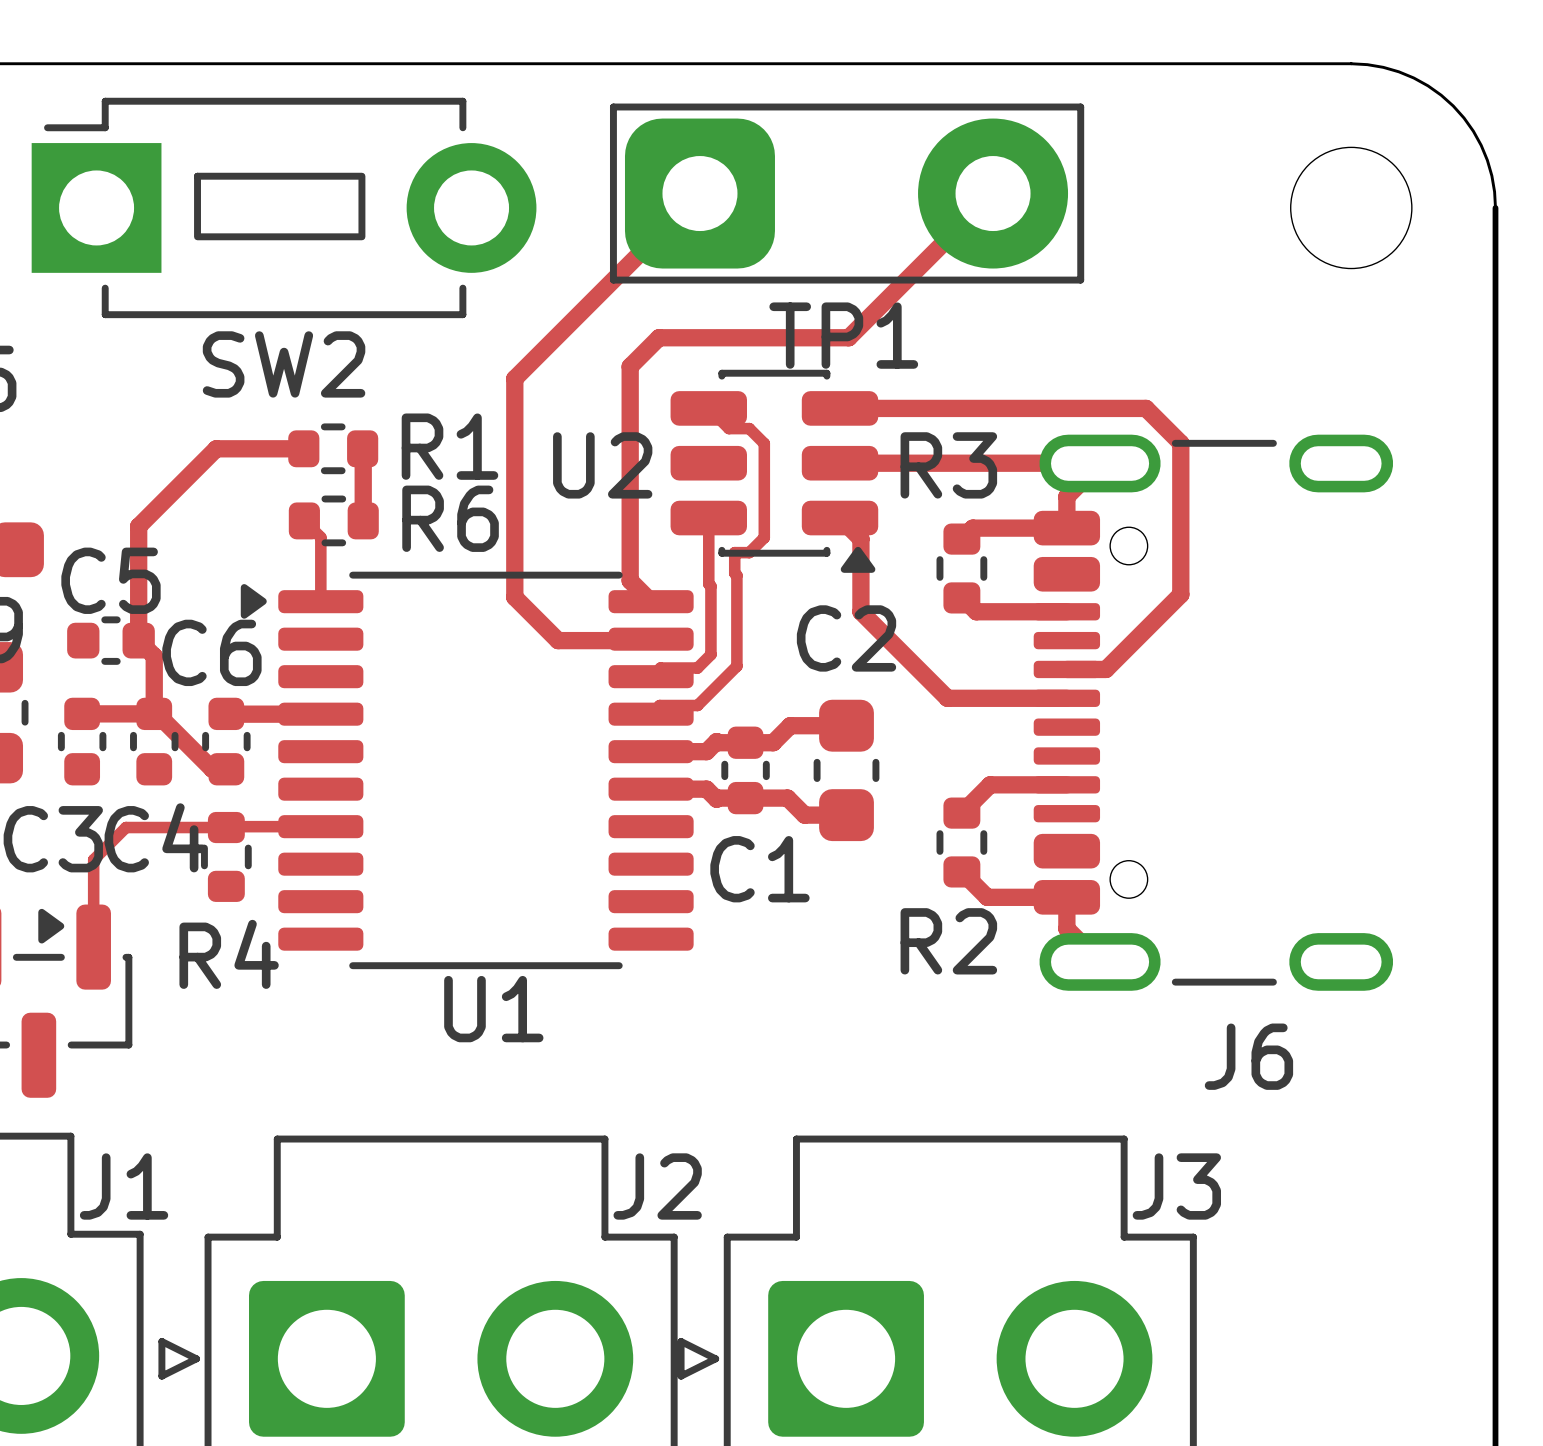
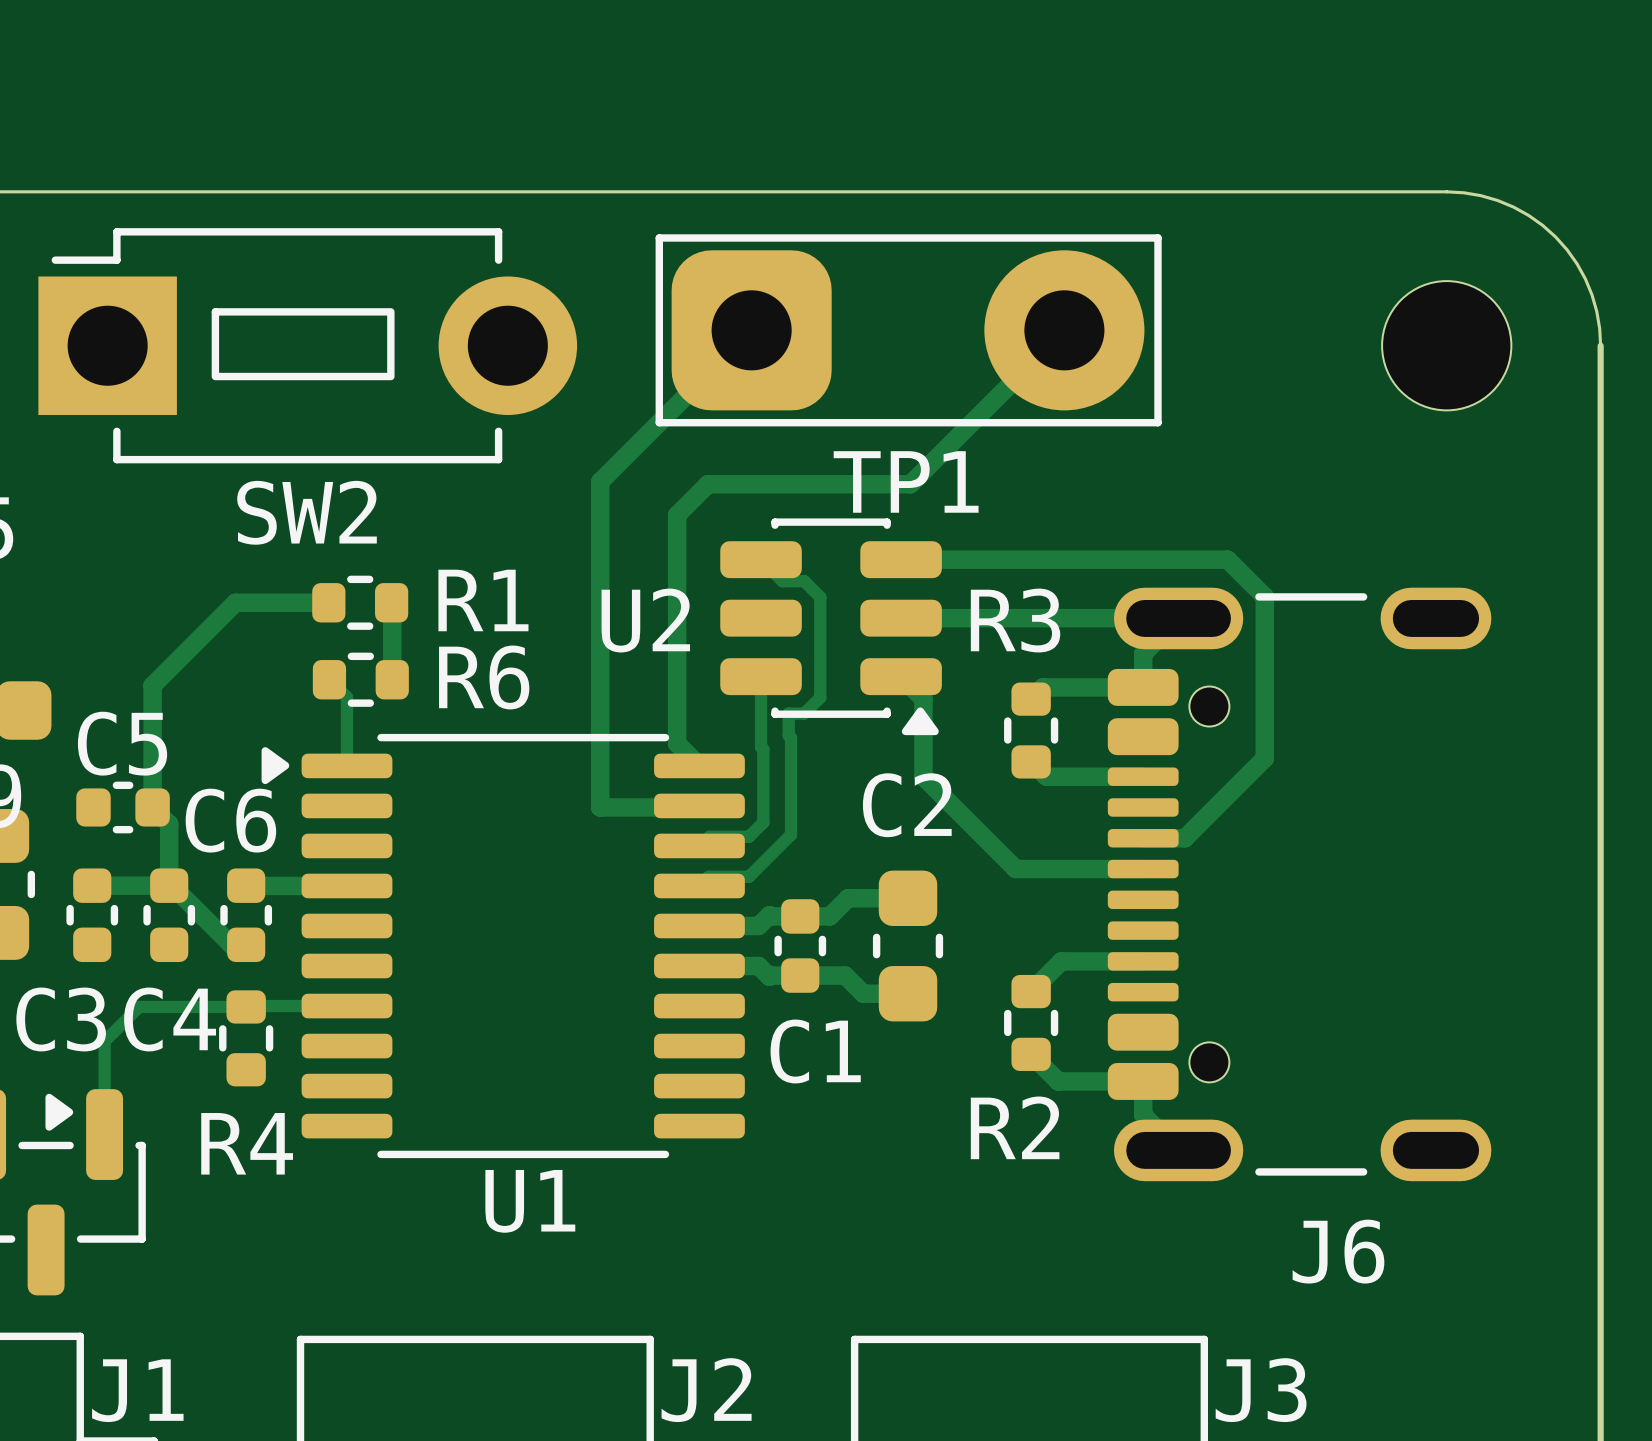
track: (558, 335) (514, 378) (514, 597) (558, 640) -> (600, 481) (600, 807)

